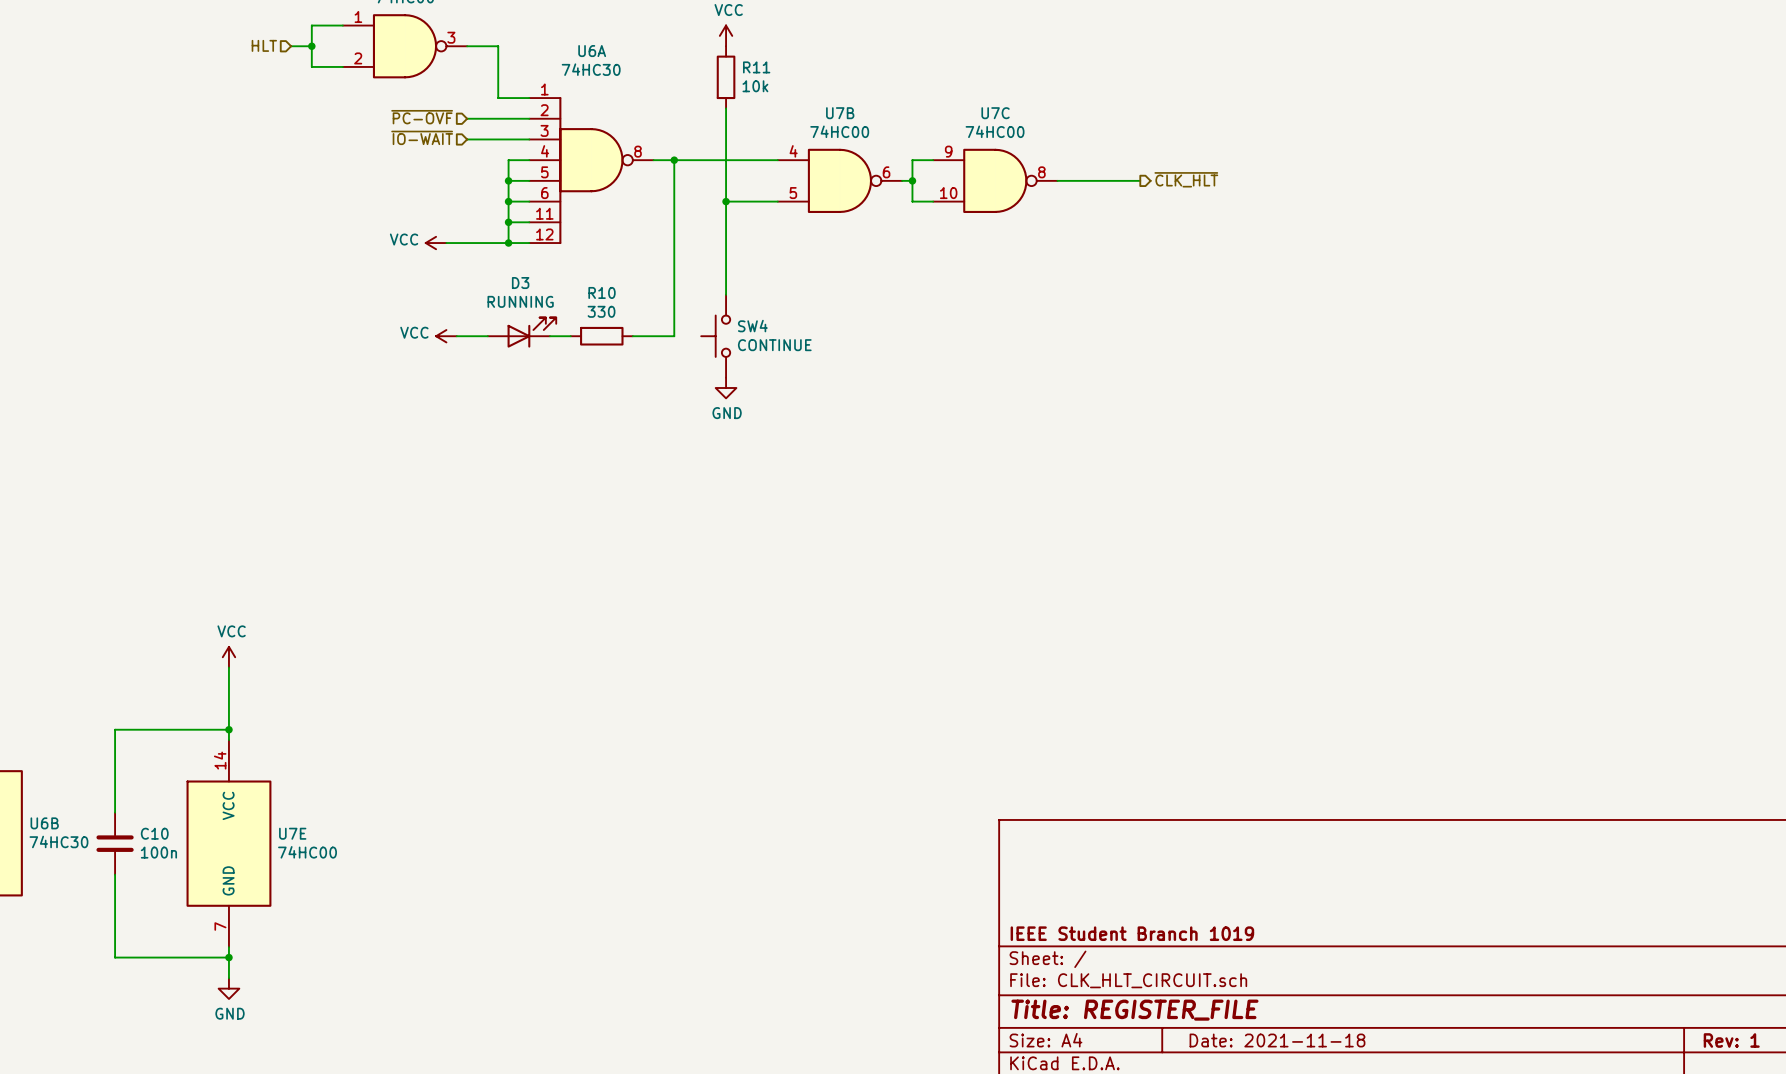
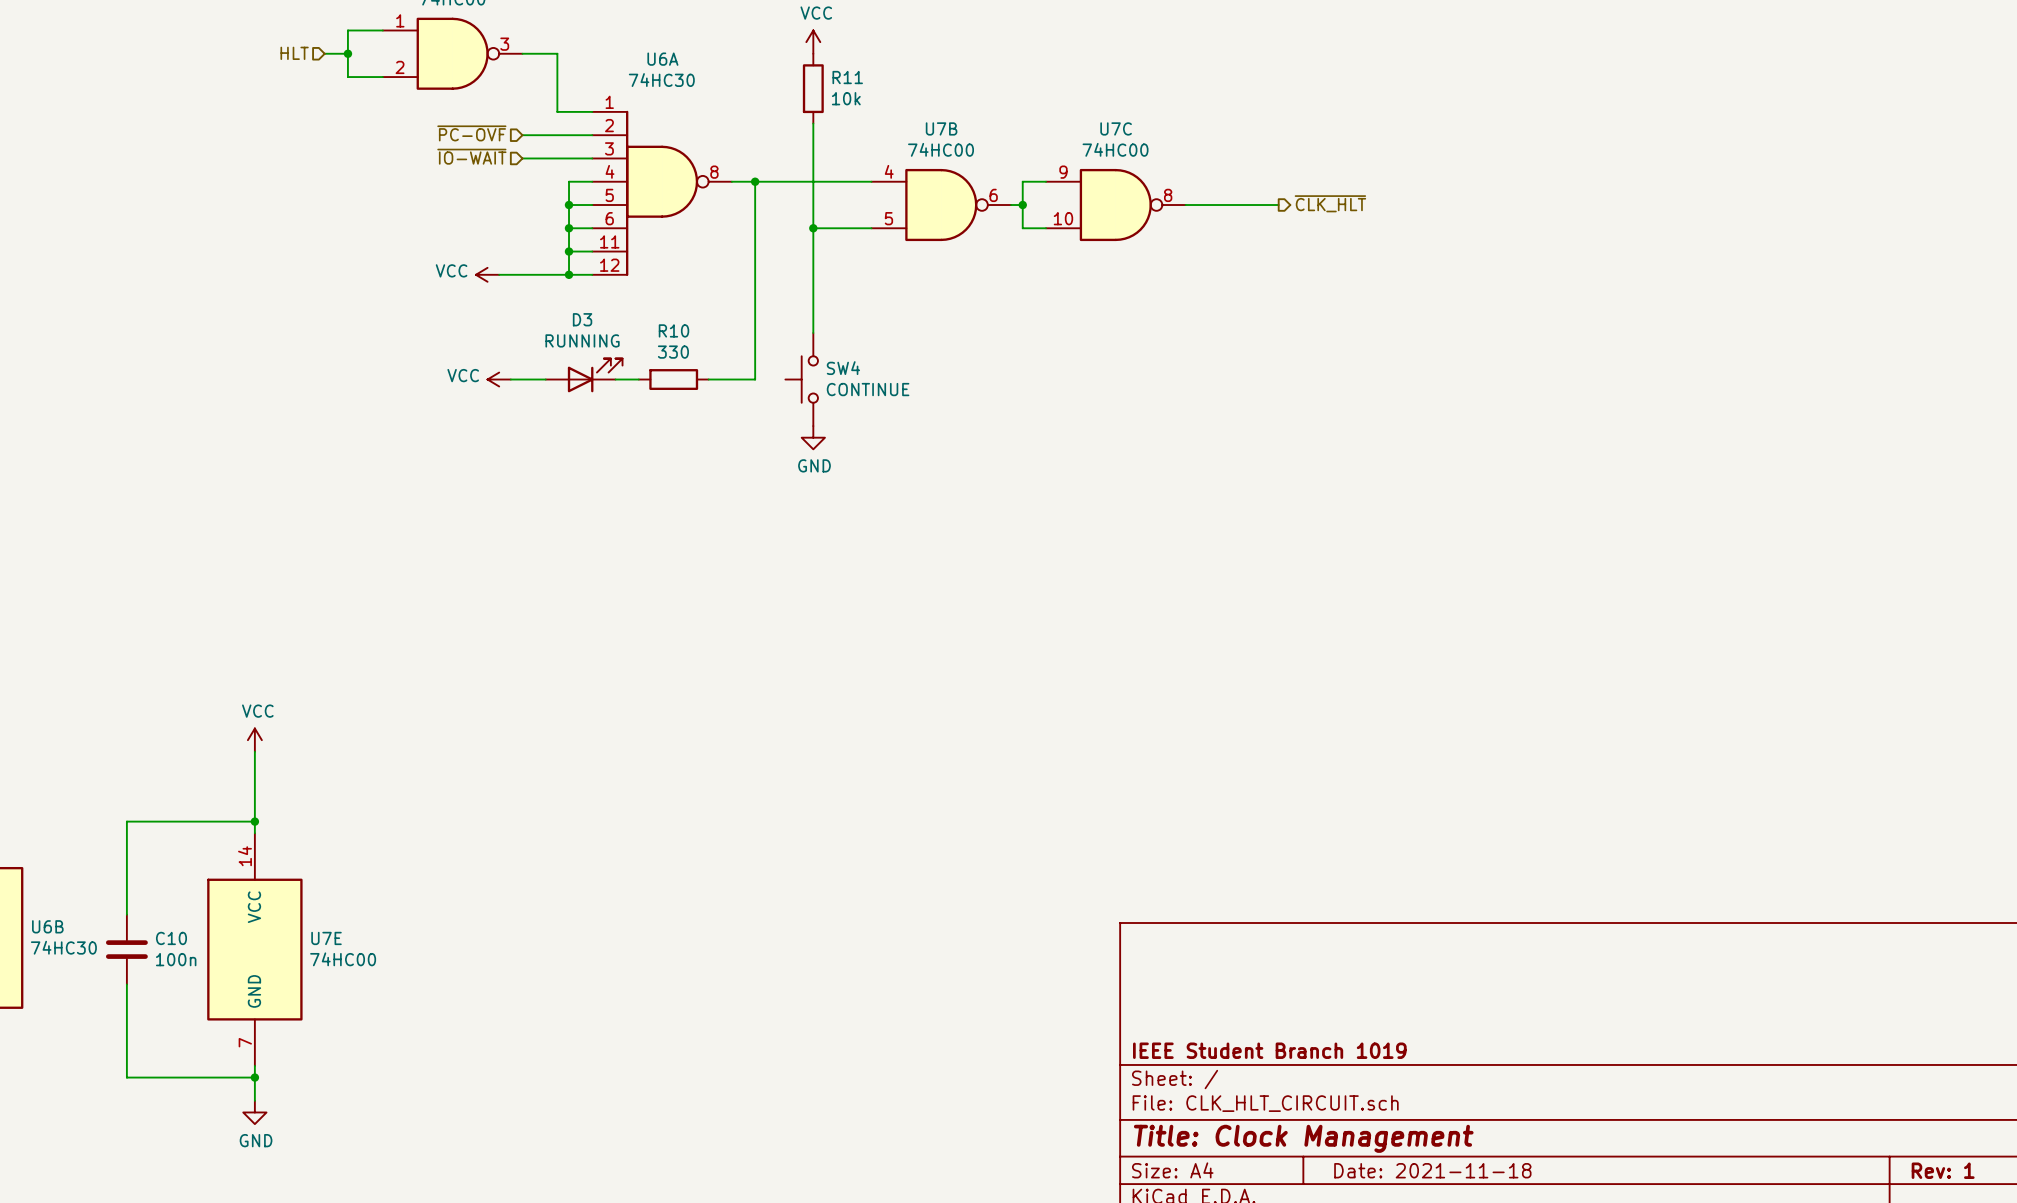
title block: Title: REGISTER_FILE (1134, 1010) -> Title: Clock Management (1303, 1138)

